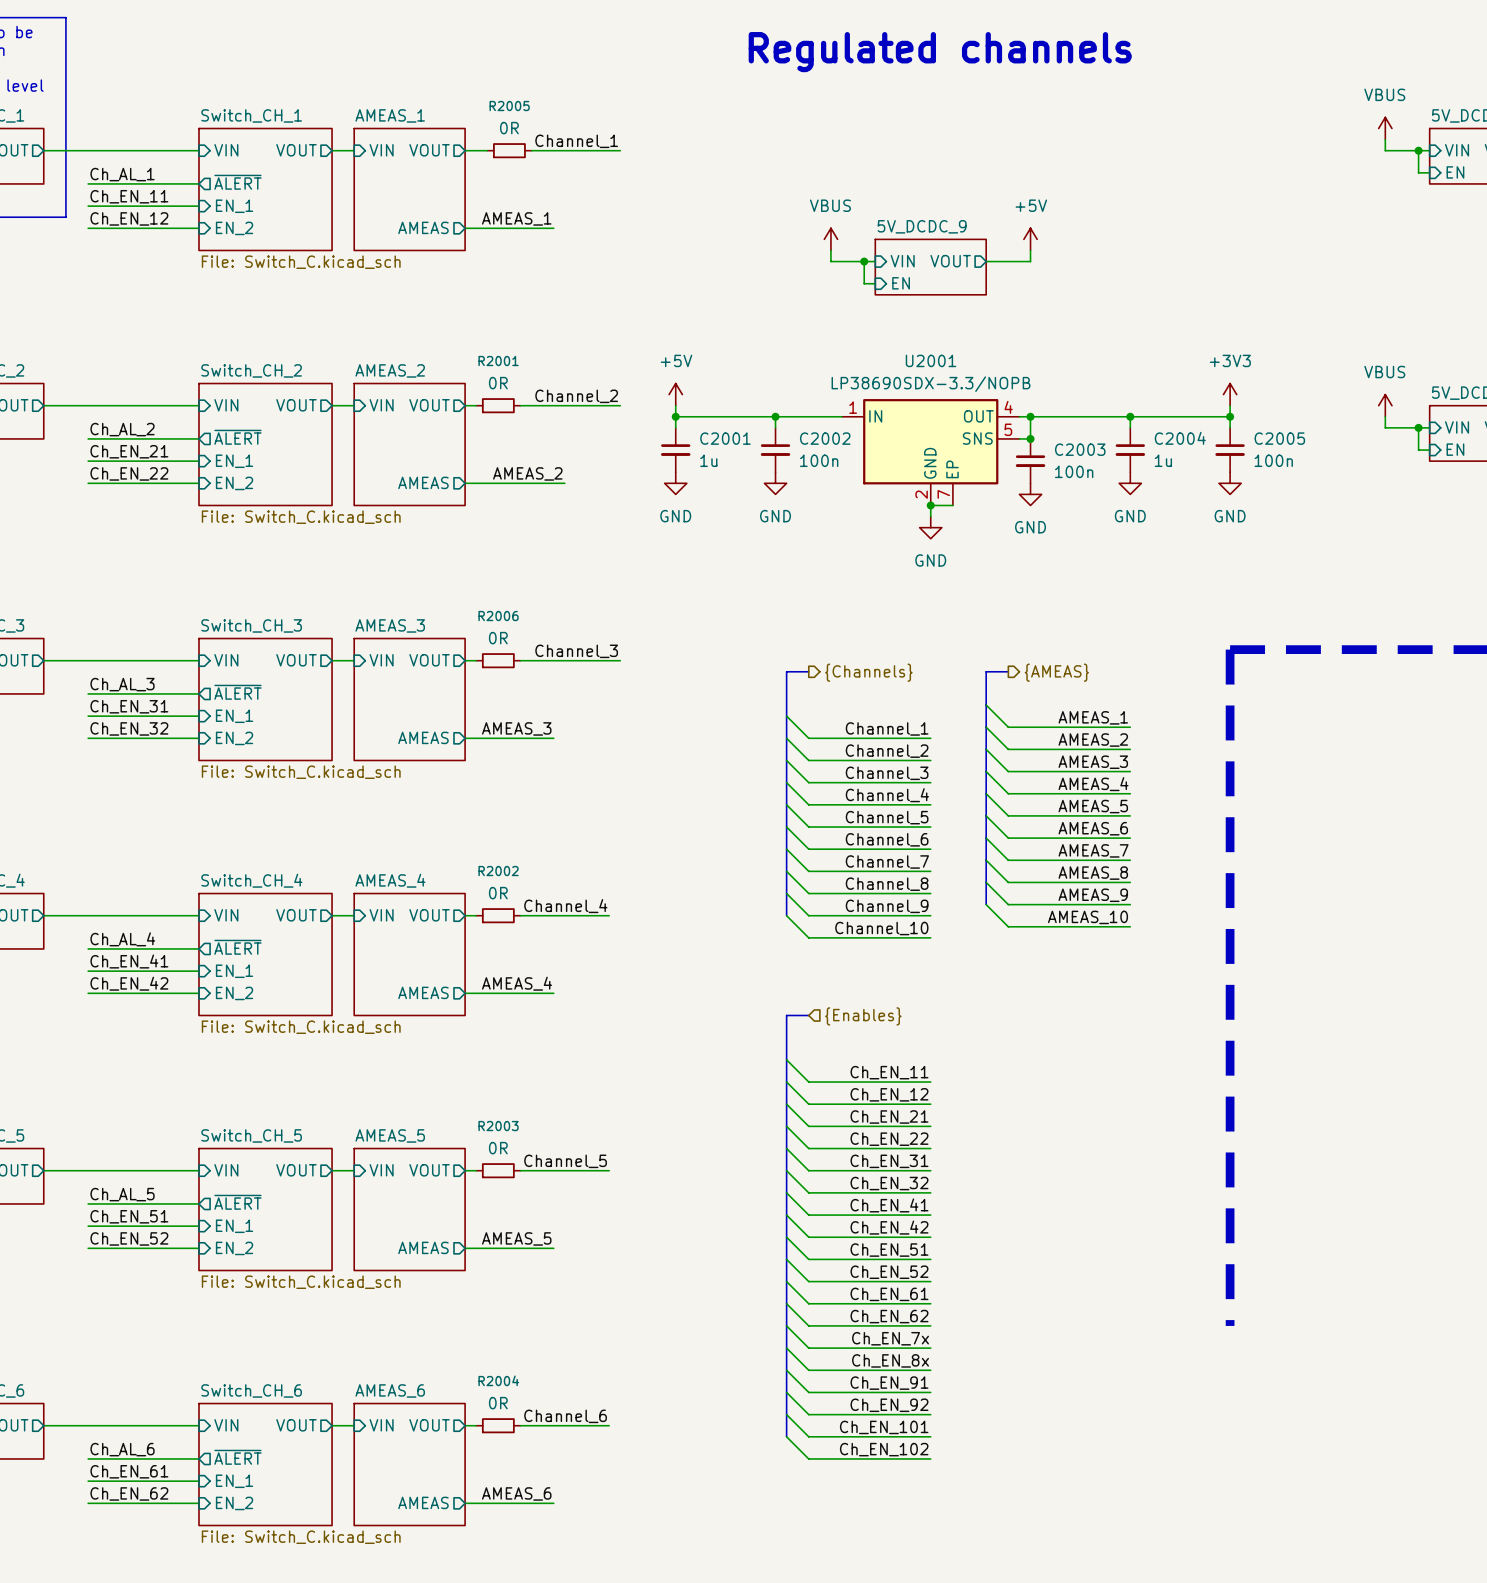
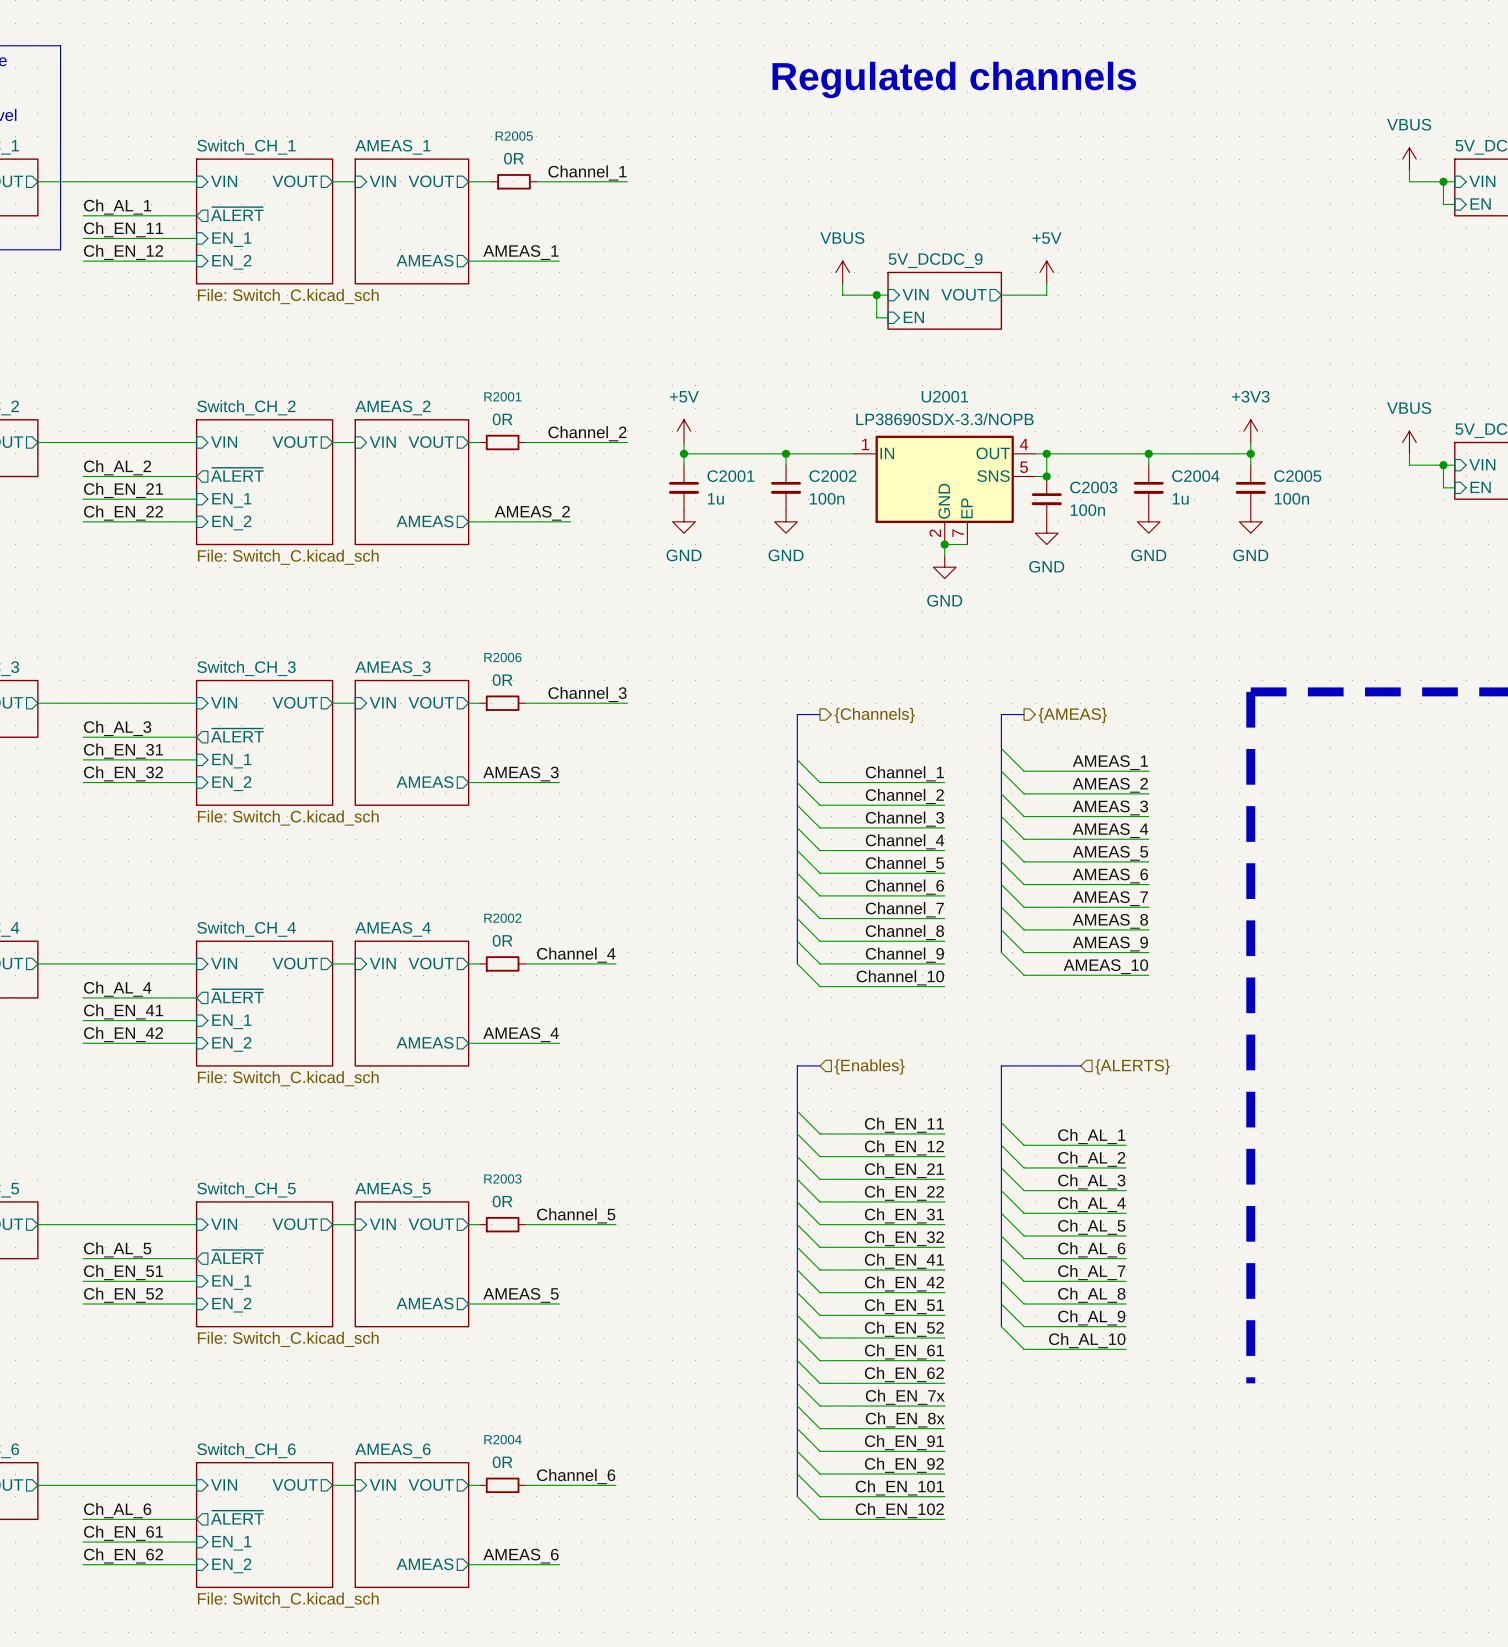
bus: none -> (1080, 1065) (1001, 1065) (1001, 1326)
hierarchical label: none -> {ALERTS} (1132, 1066)
wire: none -> (1001, 1122) (1024, 1145) (1126, 1145)
label: none -> Ch_AL_1 (1091, 1136)
wire: none -> (1001, 1145) (1024, 1167) (1126, 1167)
label: none -> Ch_AL_2 (1091, 1159)
wire: none -> (1001, 1167) (1024, 1190) (1126, 1190)
label: none -> Ch_AL_3 (1091, 1181)
wire: none -> (1001, 1190) (1024, 1213) (1126, 1213)
label: none -> Ch_AL_4 (1091, 1204)
wire: none -> (1001, 1213) (1024, 1235) (1126, 1235)
label: none -> Ch_AL_5 (1091, 1227)
wire: none -> (1001, 1235) (1024, 1258) (1126, 1258)
label: none -> Ch_AL_6 (1091, 1249)
wire: none -> (1001, 1258) (1024, 1281) (1126, 1281)
label: none -> Ch_AL_7 (1091, 1272)
wire: none -> (1001, 1281) (1024, 1303) (1126, 1303)
label: none -> Ch_AL_8 (1091, 1295)
wire: none -> (1001, 1303) (1024, 1326) (1126, 1326)
label: none -> Ch_AL_9 (1091, 1317)
wire: none -> (1001, 1326) (1024, 1349) (1126, 1349)
label: none -> Ch_AL_10 (1087, 1340)

